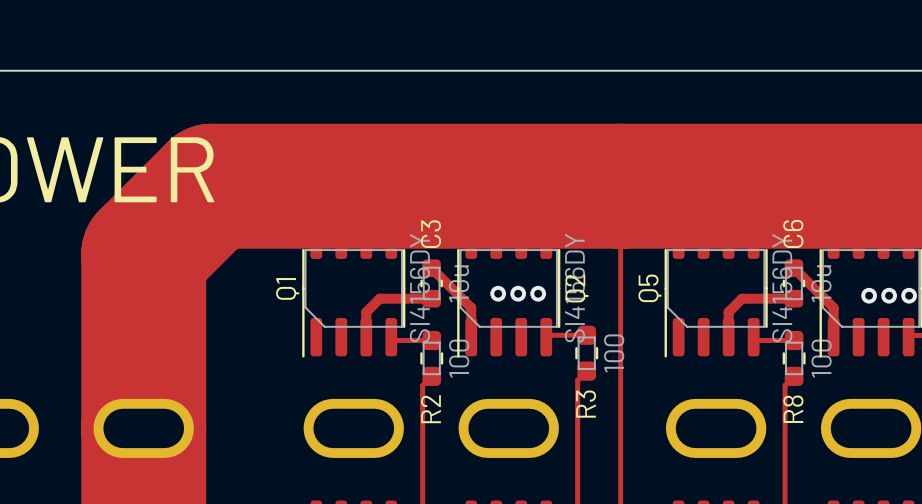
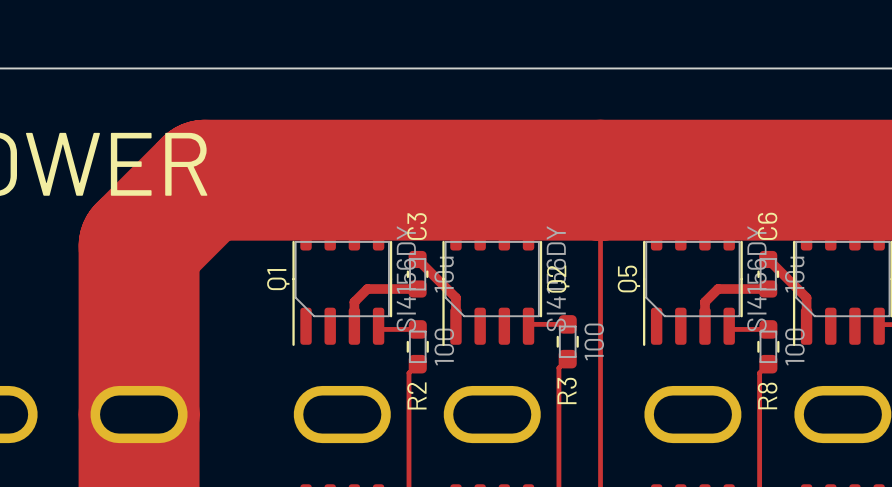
via: (498, 293) -> none
via: (518, 293) -> none
via: (538, 293) -> none
via: (869, 295) -> none
via: (889, 295) -> none
via: (909, 295) -> none

